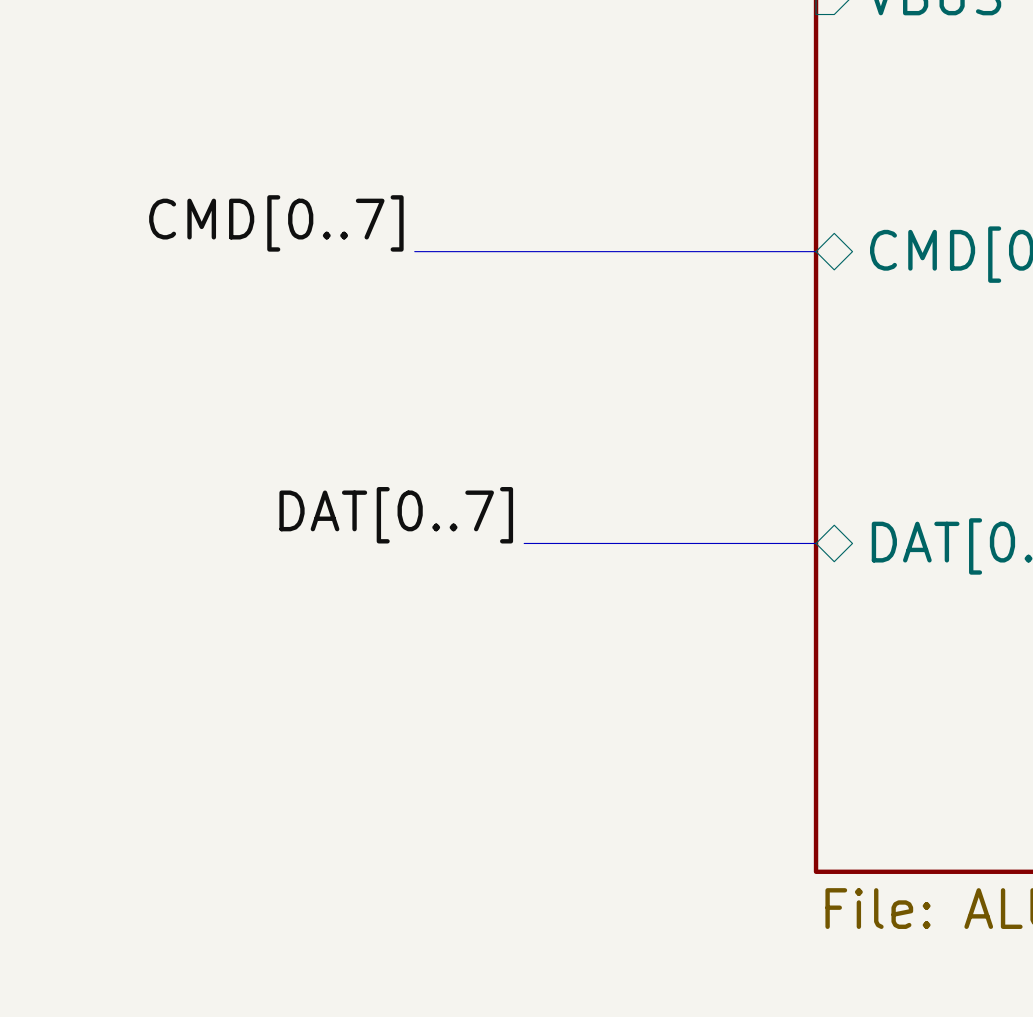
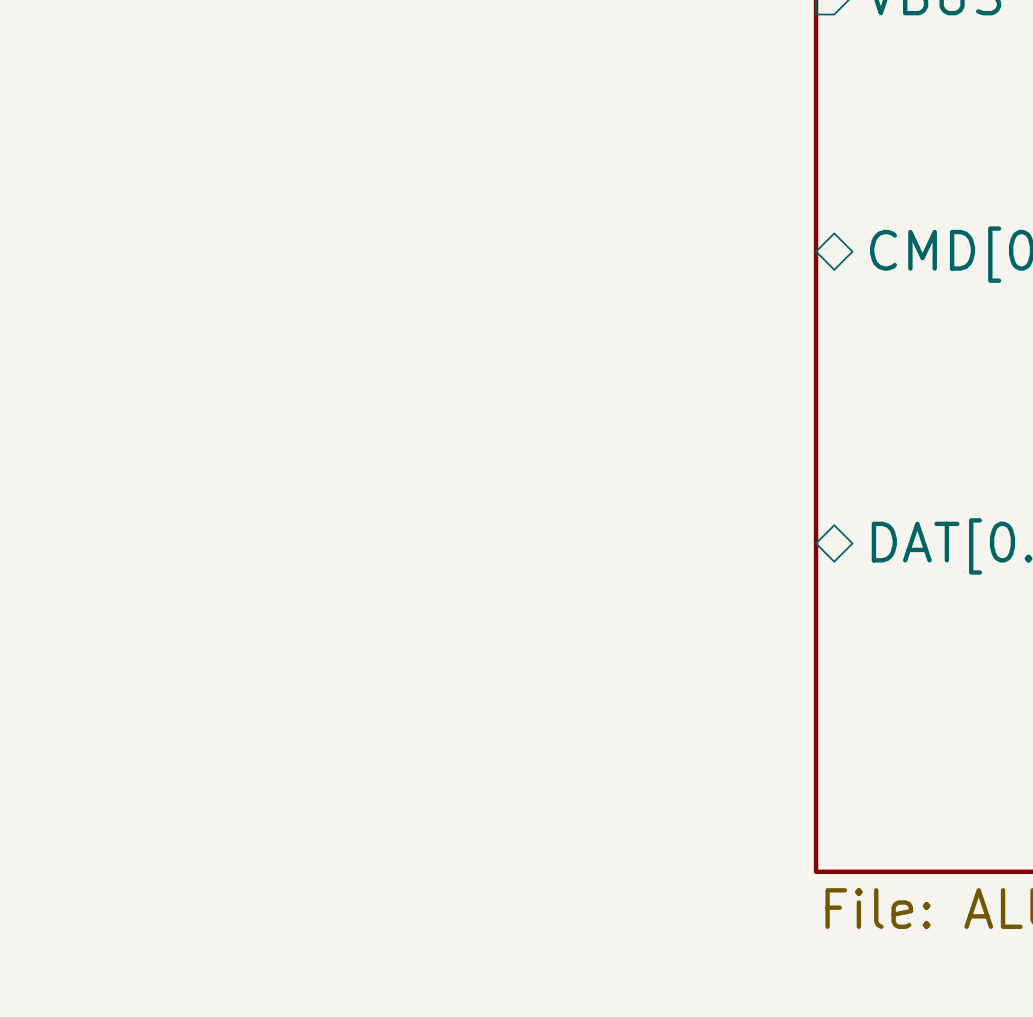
label: CMD[0..7] (276, 223) -> none
bus: (414, 251) (816, 251) -> none
label: DAT[0..7] (396, 515) -> none
bus: (524, 543) (816, 543) -> none

